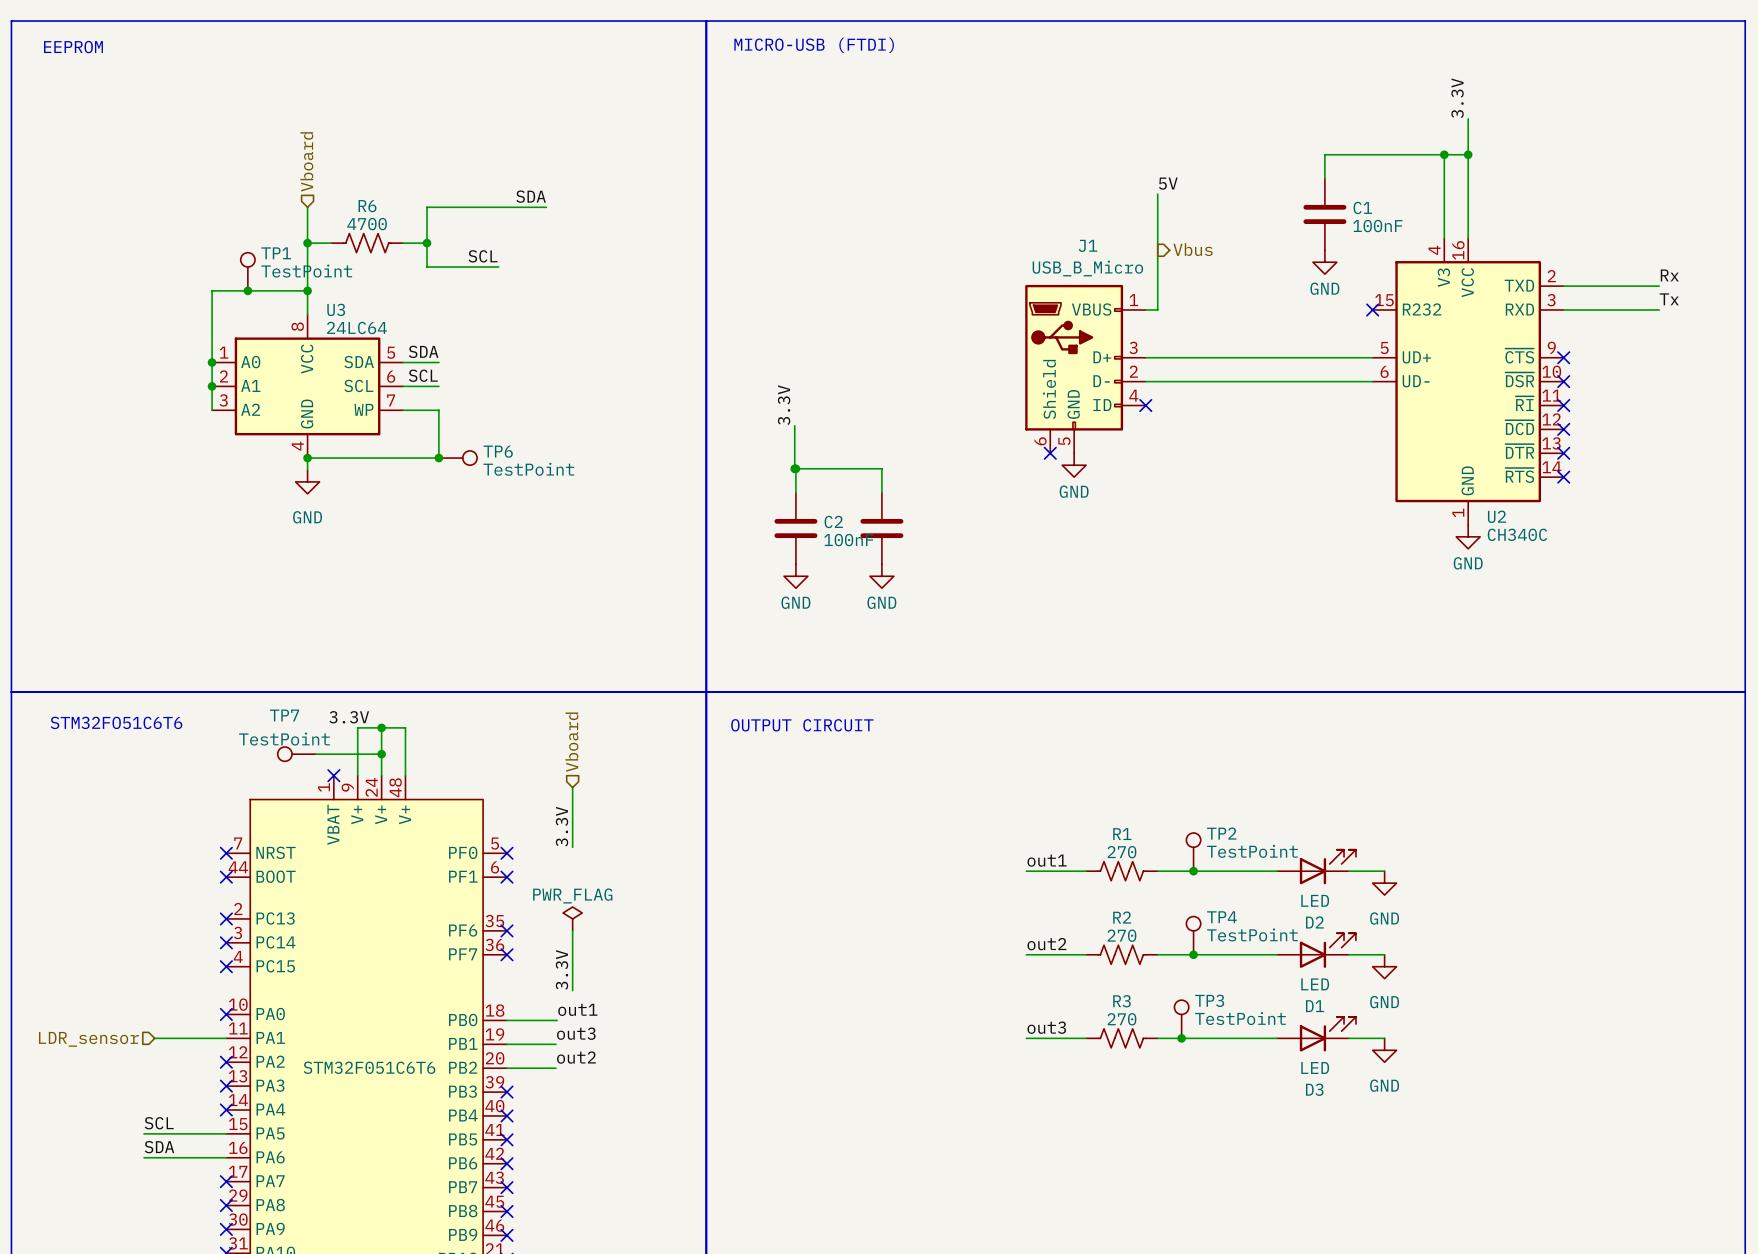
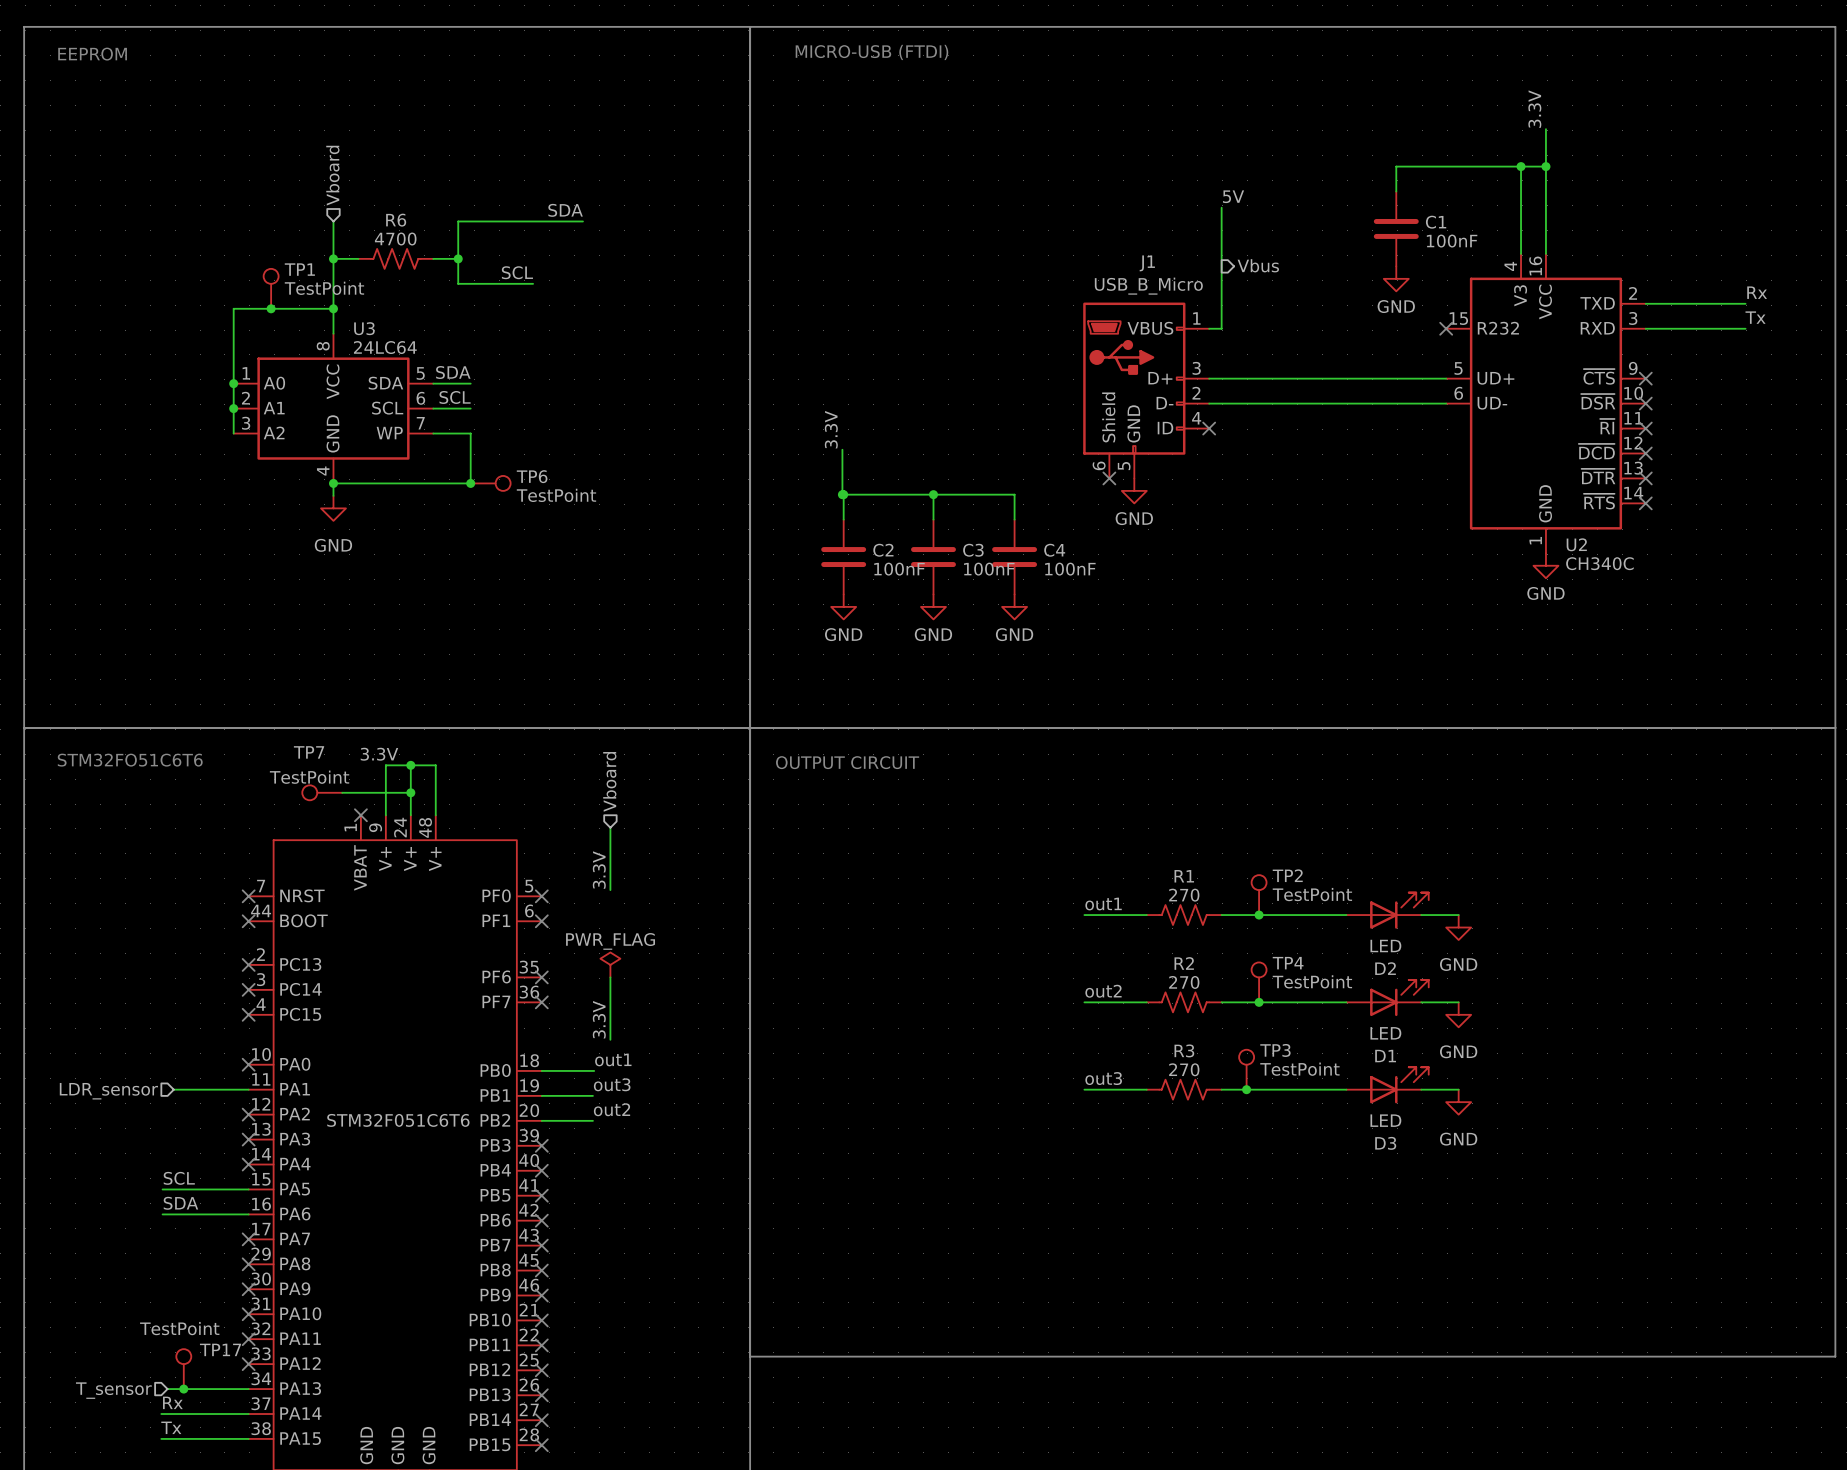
wire: none -> (933, 494) (1014, 494) (1014, 519)
junction: none -> (933, 494)
C3 name: none -> C3 (973, 550)
C4: none -> 100nF (1014, 557)
C3 value: none -> 100nF (989, 569)
power symbol: none -> GND (1014, 606)

